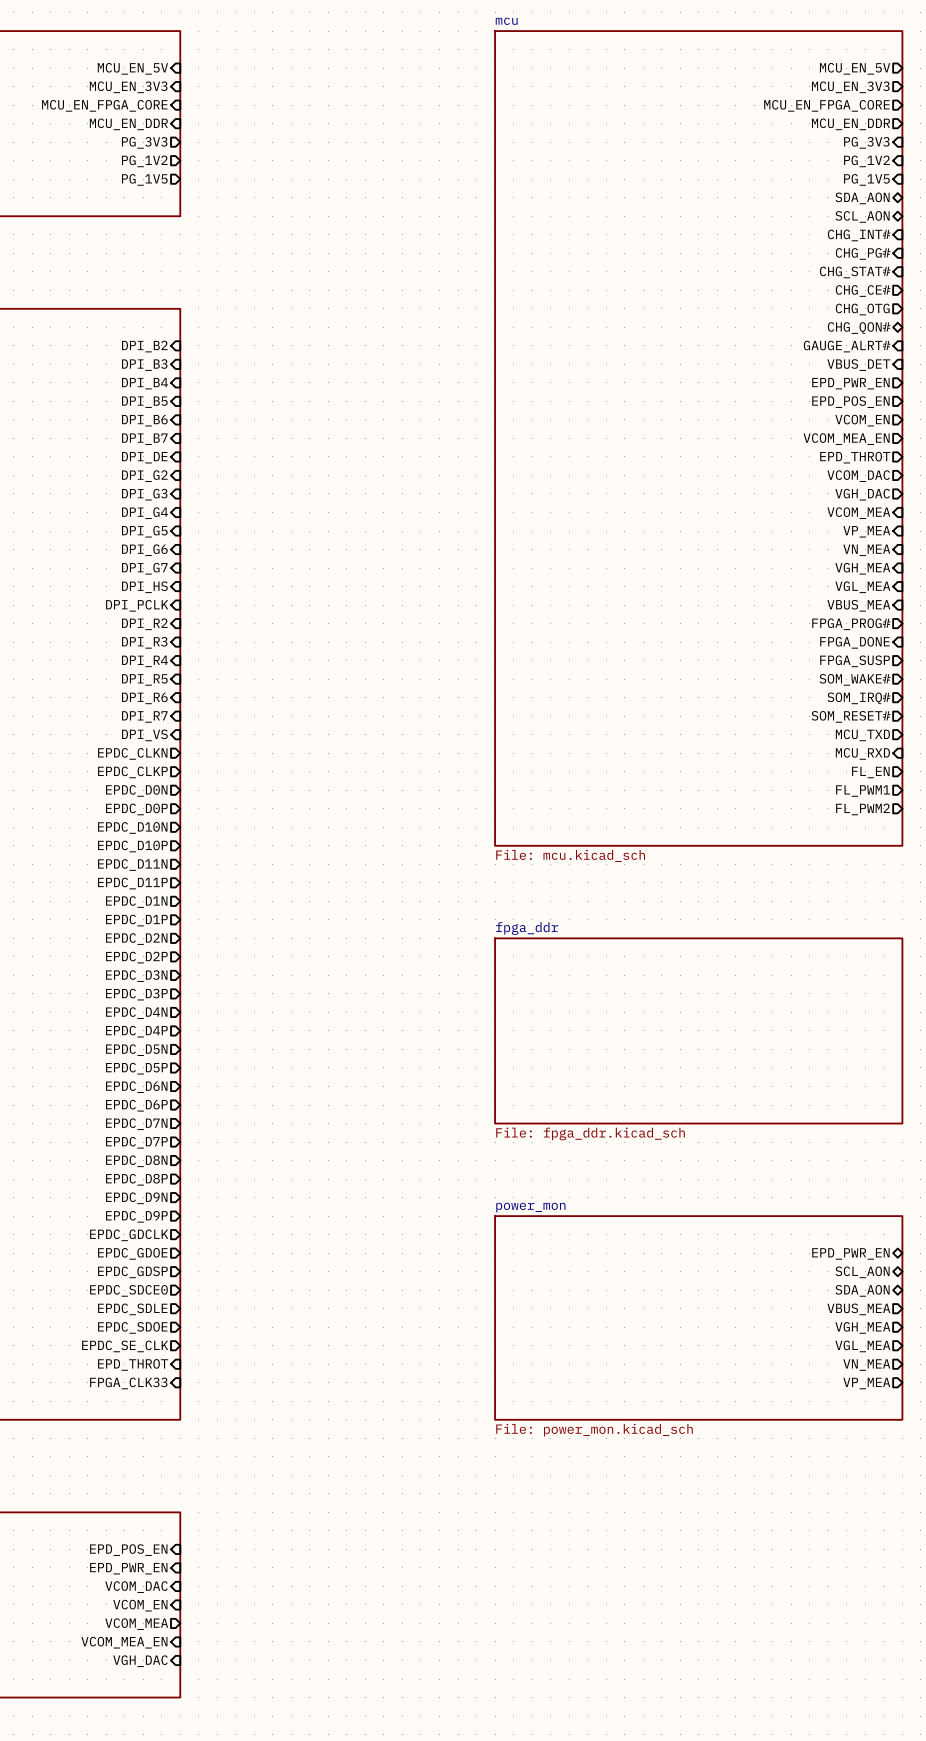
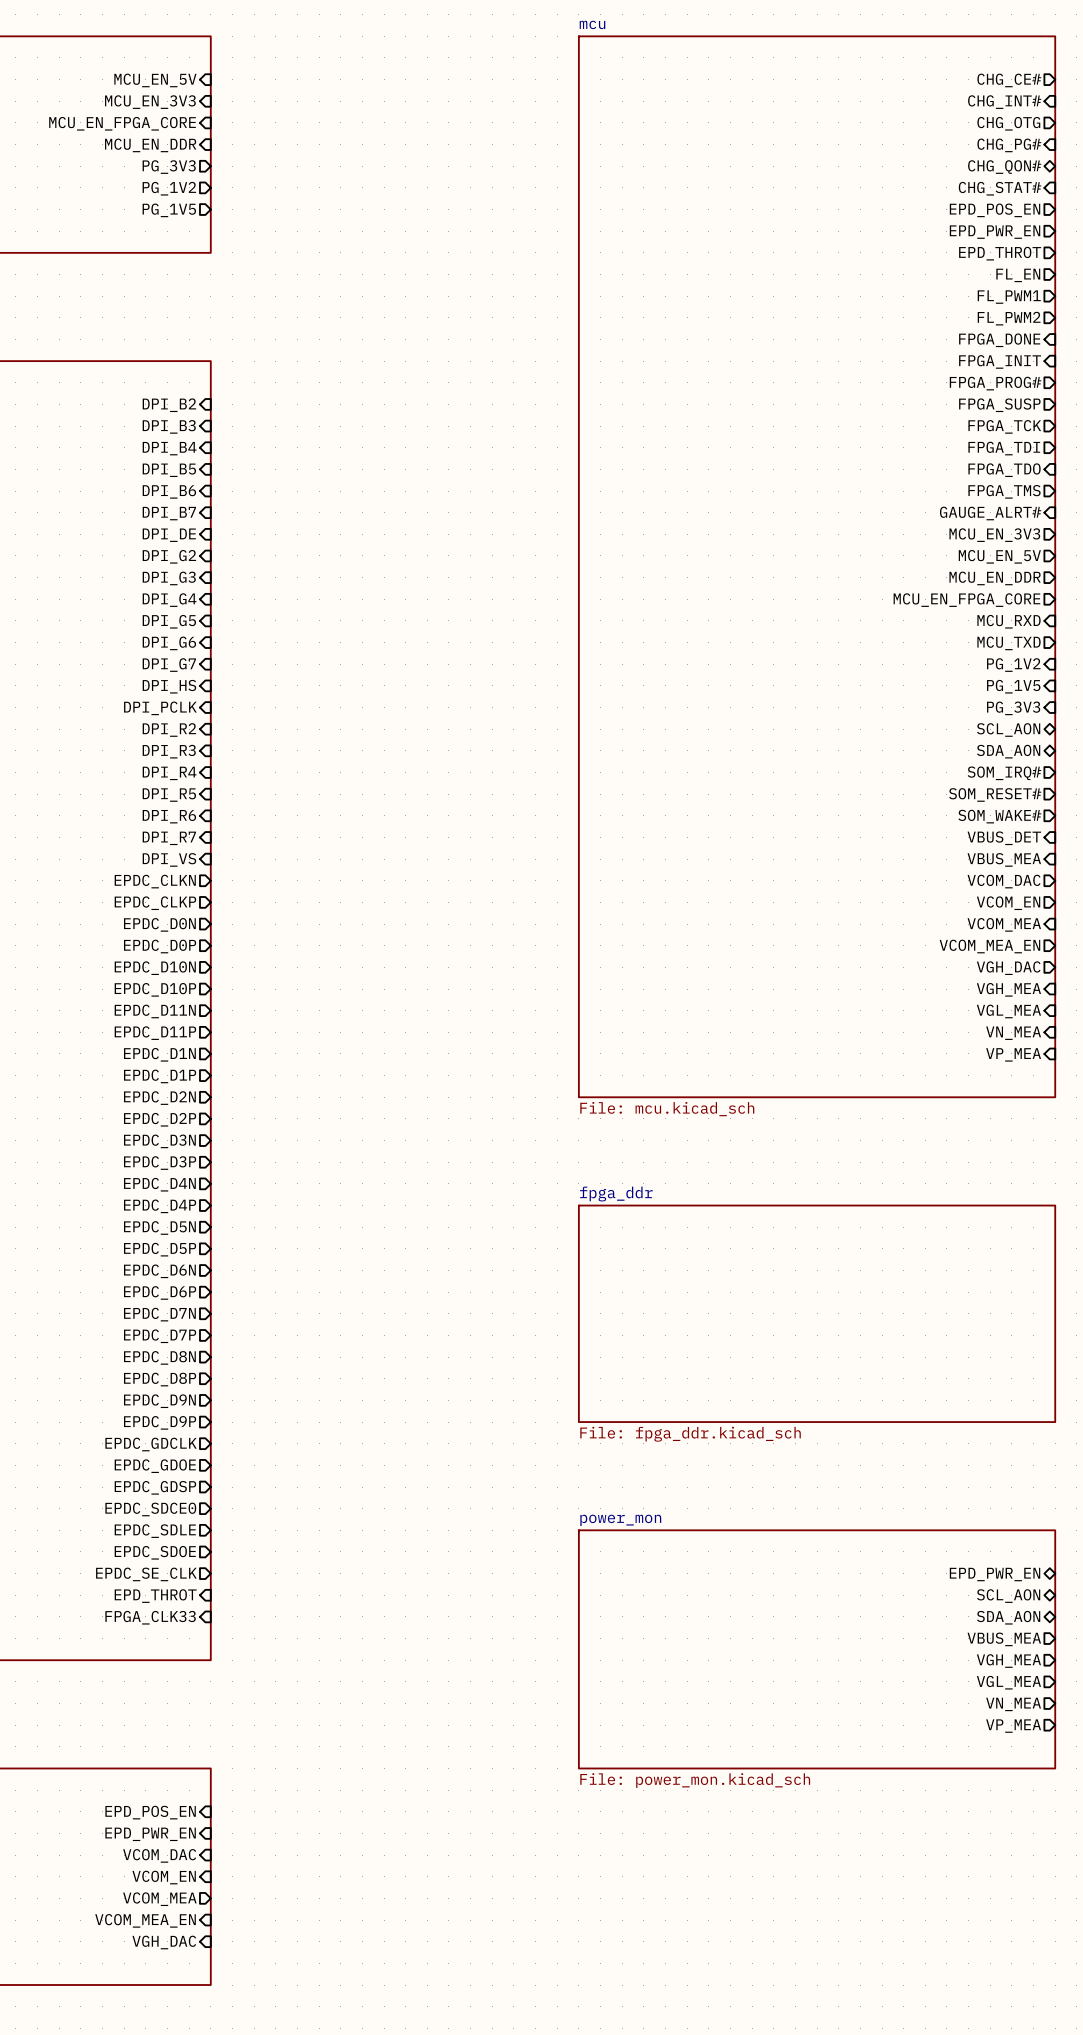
sheet pin: MCU_EN_5V (855, 68) -> CHG_CE# (1009, 80)
sheet pin shape: output (850, 87) -> input (1004, 102)
sheet pin: MCU_EN_3V3 (850, 87) -> CHG_INT# (1004, 102)
sheet pin: MCU_EN_FPGA_CORE (826, 105) -> CHG_OTG (1008, 123)
sheet pin shape: output (850, 124) -> input (1009, 145)
sheet pin: MCU_EN_DDR (850, 124) -> CHG_PG# (1009, 145)
sheet pin shape: input (866, 142) -> bidirectional (1004, 167)
sheet pin: PG_3V3 (866, 142) -> CHG_QON# (1004, 167)
sheet pin: PG_1V2 (866, 161) -> CHG_STAT# (1000, 188)
sheet pin shape: input (866, 179) -> output (995, 210)
sheet pin: PG_1V5 (866, 179) -> EPD_POS_EN (995, 210)
sheet pin shape: bidirectional (862, 198) -> output (995, 232)
sheet pin: SDA_AON (862, 198) -> EPD_PWR_EN (995, 232)
sheet pin shape: bidirectional (862, 216) -> output (1000, 253)
sheet pin: SCL_AON (862, 216) -> EPD_THROT (1000, 253)
sheet pin shape: input (859, 235) -> output (1018, 275)
sheet pin: CHG_INT# (859, 235) -> FL_EN (1018, 275)
sheet pin shape: input (863, 253) -> output (1009, 297)
sheet pin: CHG_PG# (863, 253) -> FL_PWM1 (1009, 297)
sheet pin shape: input (855, 272) -> output (1009, 318)
sheet pin: CHG_STAT# (855, 272) -> FL_PWM2 (1009, 318)
sheet pin shape: output (863, 291) -> input (999, 340)
sheet pin: CHG_CE# (863, 291) -> FPGA_DONE (999, 340)
sheet pin shape: output (862, 309) -> input (1000, 361)
sheet pin: CHG_OTG (862, 309) -> FPGA_INIT (1000, 361)
sheet pin shape: bidirectional (859, 328) -> output (995, 383)
sheet pin: CHG_QON# (859, 328) -> FPGA_PROG# (995, 383)
sheet pin shape: input (847, 346) -> output (999, 405)
sheet pin: GAUGE_ALRT# (847, 346) -> FPGA_SUSP (999, 405)
sheet pin shape: input (858, 365) -> output (1004, 426)
sheet pin: VBUS_DET (858, 365) -> FPGA_TCK (1004, 426)
sheet pin: EPD_PWR_EN (850, 383) -> FPGA_TDI (1004, 448)
sheet pin shape: output (850, 402) -> input (1004, 470)
sheet pin: EPD_POS_EN (850, 402) -> FPGA_TDO (1004, 470)
sheet pin: VCOM_EN (862, 420) -> FPGA_TMS (1004, 491)
sheet mcu: File: mcu.kicad_sch (698, 438) -> none
sheet pin shape: output (846, 439) -> input (990, 513)
sheet pin: VCOM_MEA_EN (846, 439) -> GAUGE_ALRT# (990, 513)
sheet pin: EPD_THROT (855, 457) -> MCU_EN_3V3 (994, 535)
sheet pin: VCOM_DAC (858, 476) -> MCU_EN_5V (999, 556)
sheet mcu: none -> File: mcu.kicad_sch (817, 566)
sheet pin: VGH_DAC (862, 494) -> MCU_EN_DDR (995, 578)
sheet pin shape: input (858, 513) -> output (966, 600)
sheet pin: VCOM_MEA (858, 513) -> MCU_EN_FPGA_CORE (966, 600)
sheet pin: VP_MEA (866, 531) -> MCU_RXD (1008, 621)
sheet pin shape: input (866, 550) -> output (1008, 643)
sheet pin: VN_MEA (866, 550) -> MCU_TXD (1008, 643)
sheet pin: VGH_MEA (862, 568) -> PG_1V2 (1013, 665)
sheet pin: VGL_MEA (862, 587) -> PG_1V5 (1013, 686)
sheet pin: VBUS_MEA (858, 605) -> PG_3V3 (1013, 708)
sheet pin shape: output (851, 624) -> bidirectional (1008, 730)
sheet pin: FPGA_PROG# (851, 624) -> SCL_AON (1008, 730)
sheet pin shape: input (854, 642) -> bidirectional (1008, 751)
sheet pin: FPGA_DONE (854, 642) -> SDA_AON (1008, 751)
sheet pin: FPGA_SUSP (855, 661) -> SOM_IRQ# (1004, 773)
sheet pin: SOM_WAKE# (855, 679) -> SOM_RESET# (995, 794)
sheet pin: SOM_IRQ# (859, 698) -> SOM_WAKE# (999, 816)
sheet pin shape: output (851, 716) -> input (1004, 838)
sheet pin: SOM_RESET# (851, 716) -> VBUS_DET (1004, 838)
sheet pin shape: output (862, 735) -> input (1004, 859)
sheet pin: MCU_TXD (862, 735) -> VBUS_MEA (1004, 859)
sheet pin shape: input (862, 753) -> output (1004, 881)
sheet pin: MCU_RXD (862, 753) -> VCOM_DAC (1004, 881)
sheet pin: FL_EN (870, 772) -> VCOM_EN (1008, 903)
sheet pin shape: output (863, 791) -> input (1004, 924)
sheet pin: FL_PWM1 (863, 791) -> VCOM_MEA (1004, 924)
sheet pin: FL_PWM2 (862, 809) -> VCOM_MEA_EN (989, 946)
sheet pin: none -> VGH_DAC (1008, 968)
sheet pin: none -> VGH_MEA (1008, 989)
sheet pin: none -> VGL_MEA (1008, 1011)
sheet pin: none -> VN_MEA (1013, 1033)
sheet pin: none -> VP_MEA (1013, 1054)
sheet fpga_ddr position: (698, 1030) -> (817, 1313)
sheet pin: EPD_PWR_EN (850, 1253) -> none
sheet pin: SCL_AON (862, 1272) -> none
sheet pin: SDA_AON (862, 1290) -> none
sheet pin position: VBUS_MEA (858, 1309) -> VBUS_MEA (1004, 1639)
sheet power_mon position: (698, 1317) -> (817, 1649)
sheet pin position: VGH_MEA (862, 1327) -> VGH_MEA (1008, 1661)
sheet pin shape: output (862, 1346) -> bidirectional (995, 1574)
sheet pin: VGL_MEA (862, 1346) -> EPD_PWR_EN (995, 1574)
sheet pin shape: output (866, 1365) -> bidirectional (1008, 1596)
sheet pin: VN_MEA (866, 1365) -> SCL_AON (1008, 1596)
sheet pin shape: output (866, 1383) -> bidirectional (1008, 1617)
sheet pin: VP_MEA (866, 1383) -> SDA_AON (1008, 1617)
sheet pin: none -> VGL_MEA (1008, 1682)
sheet pin: none -> VN_MEA (1013, 1704)
sheet pin: none -> VP_MEA (1013, 1726)

